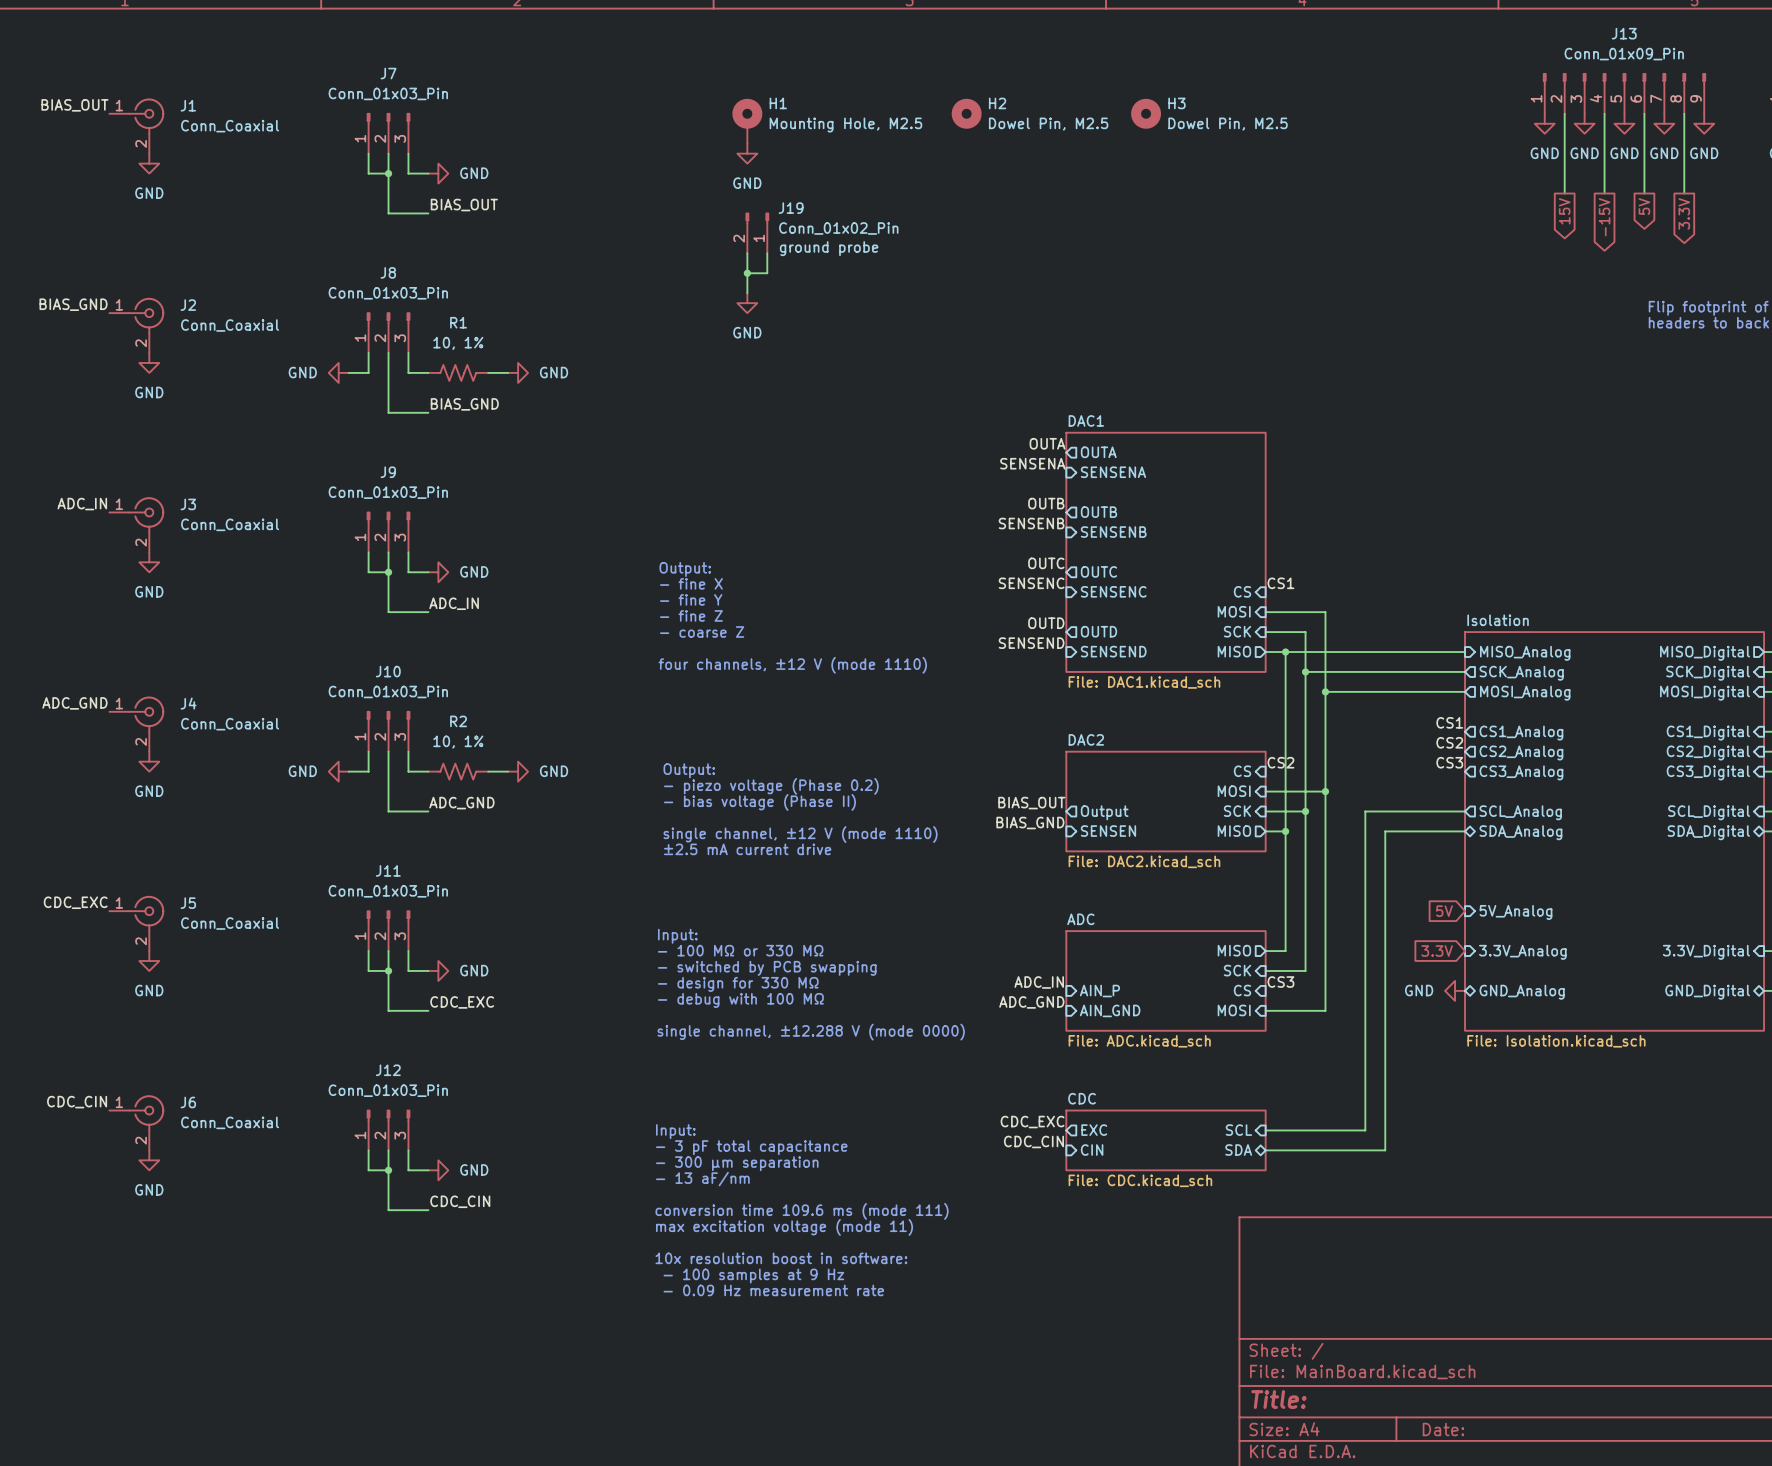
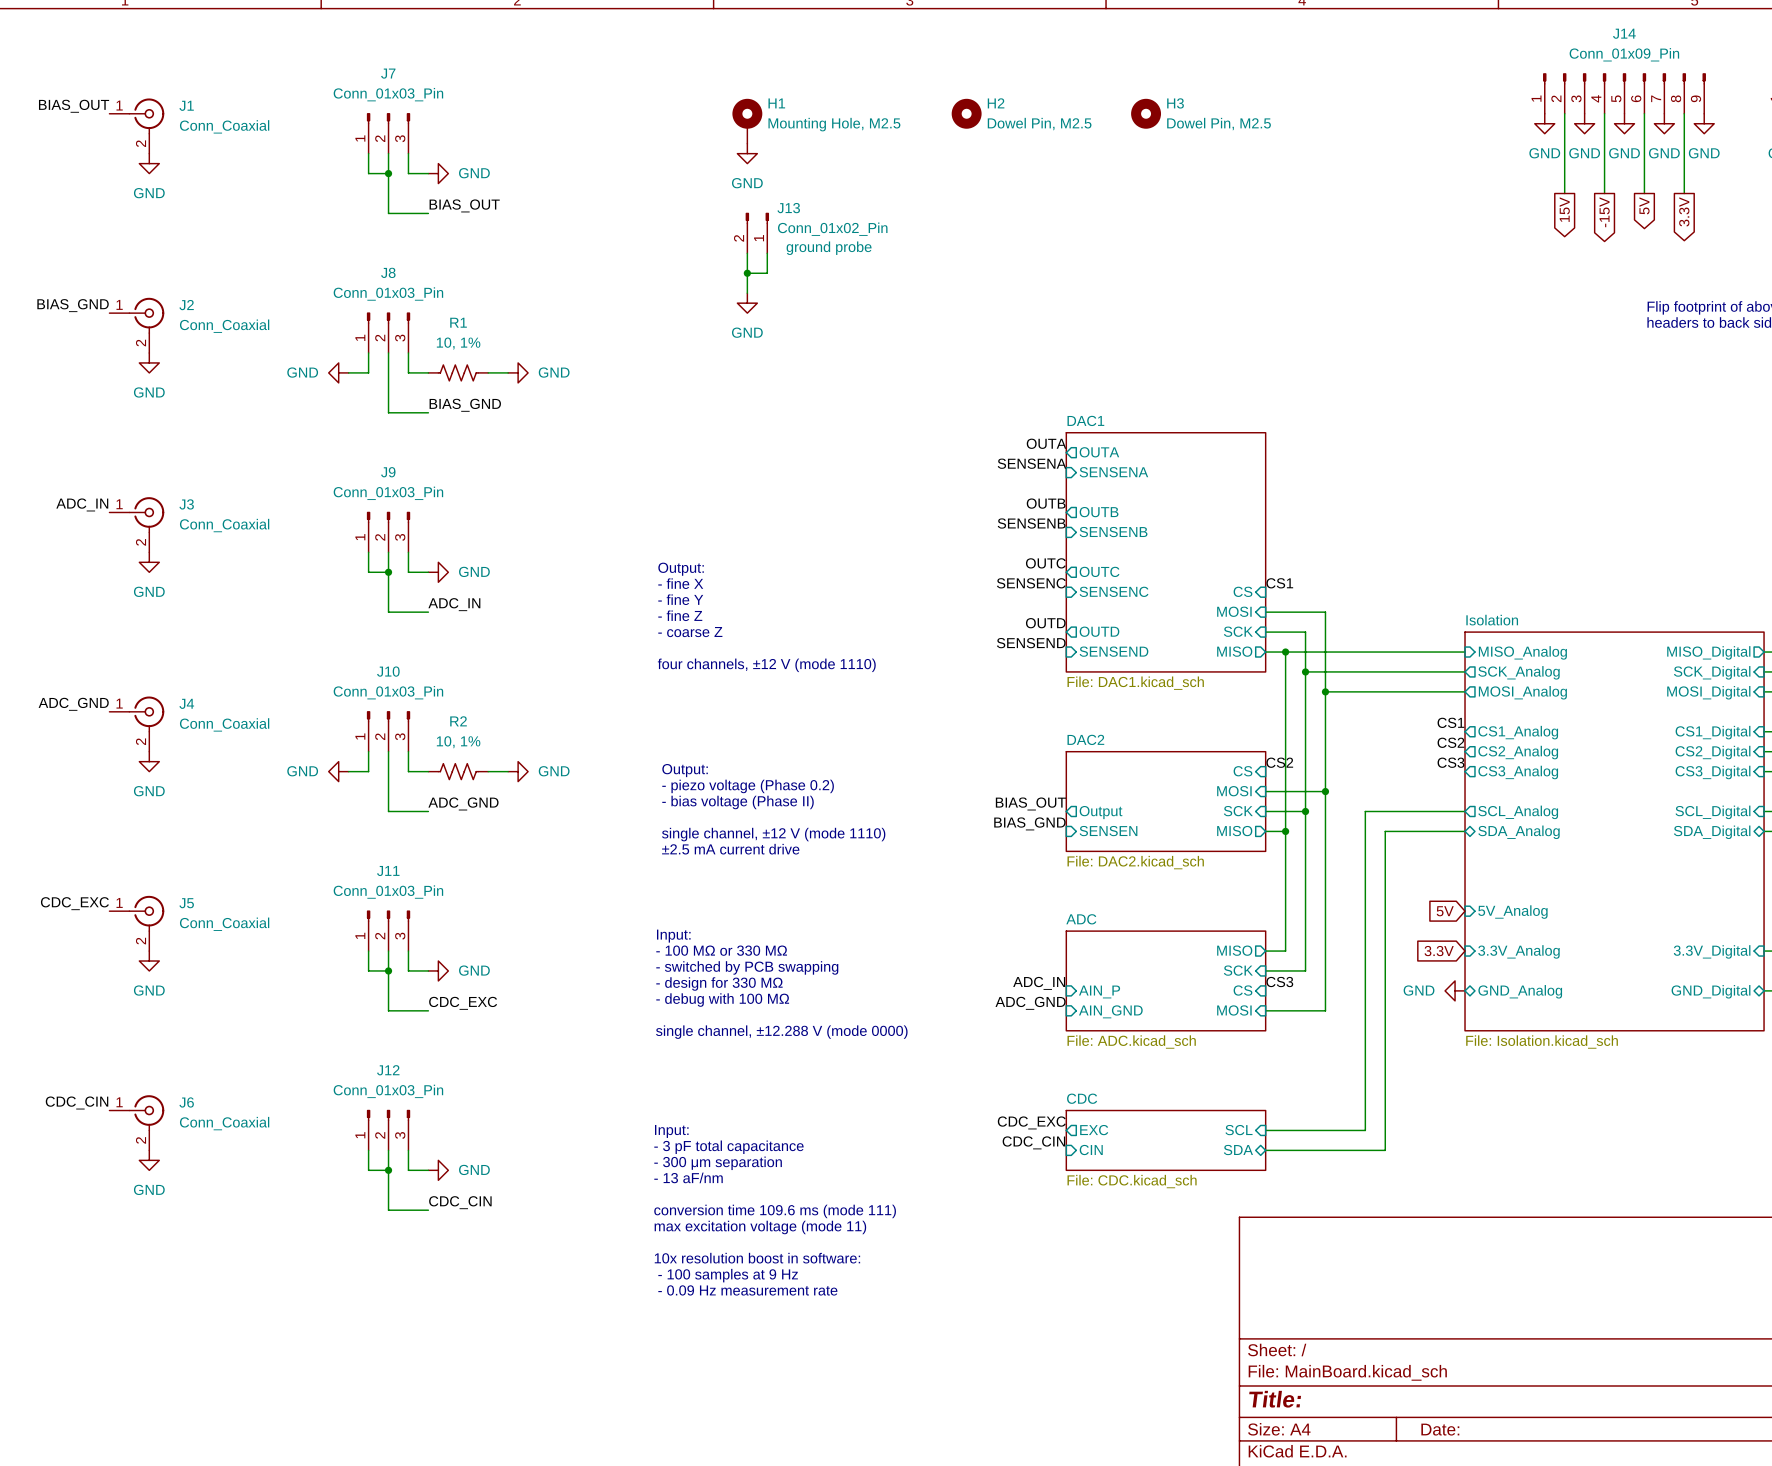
J13 name: J13 (1624, 33) -> J14 (1624, 33)
J19 name: J19 (791, 208) -> J13 (788, 208)

